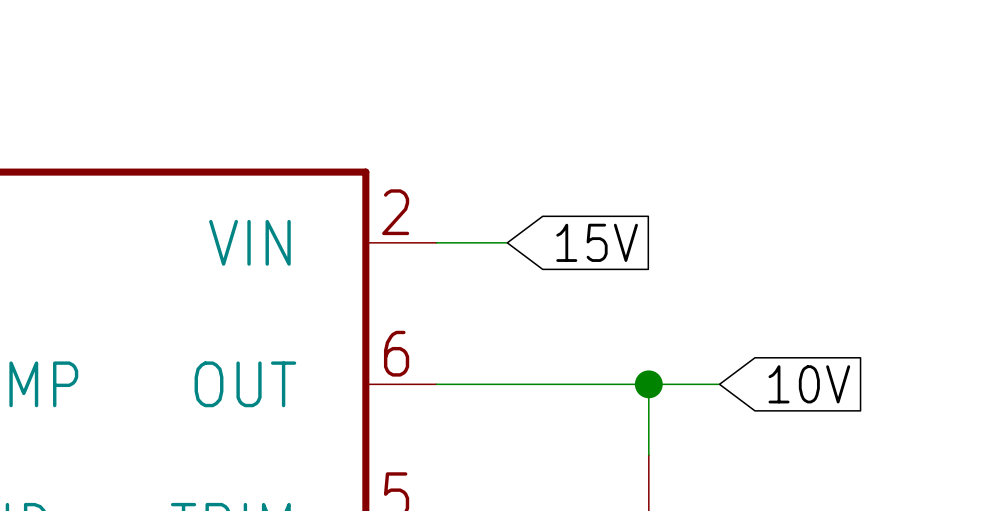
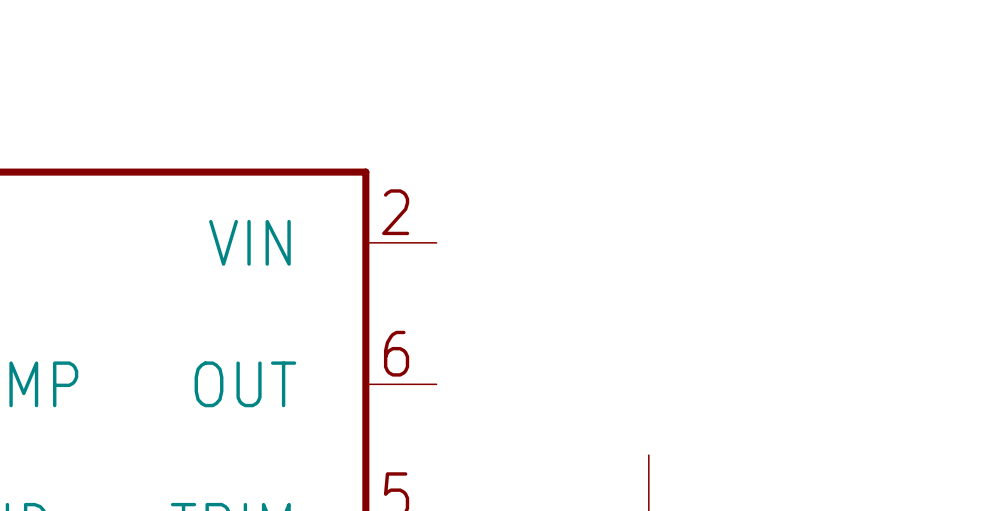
wire: (436, 242) (507, 242) -> none
global label: 15V (597, 242) -> none
wire: (436, 384) (719, 384) -> none
wire: (648, 384) (648, 455) -> none
junction: (648, 384) -> none
global label: 10V (809, 384) -> none

